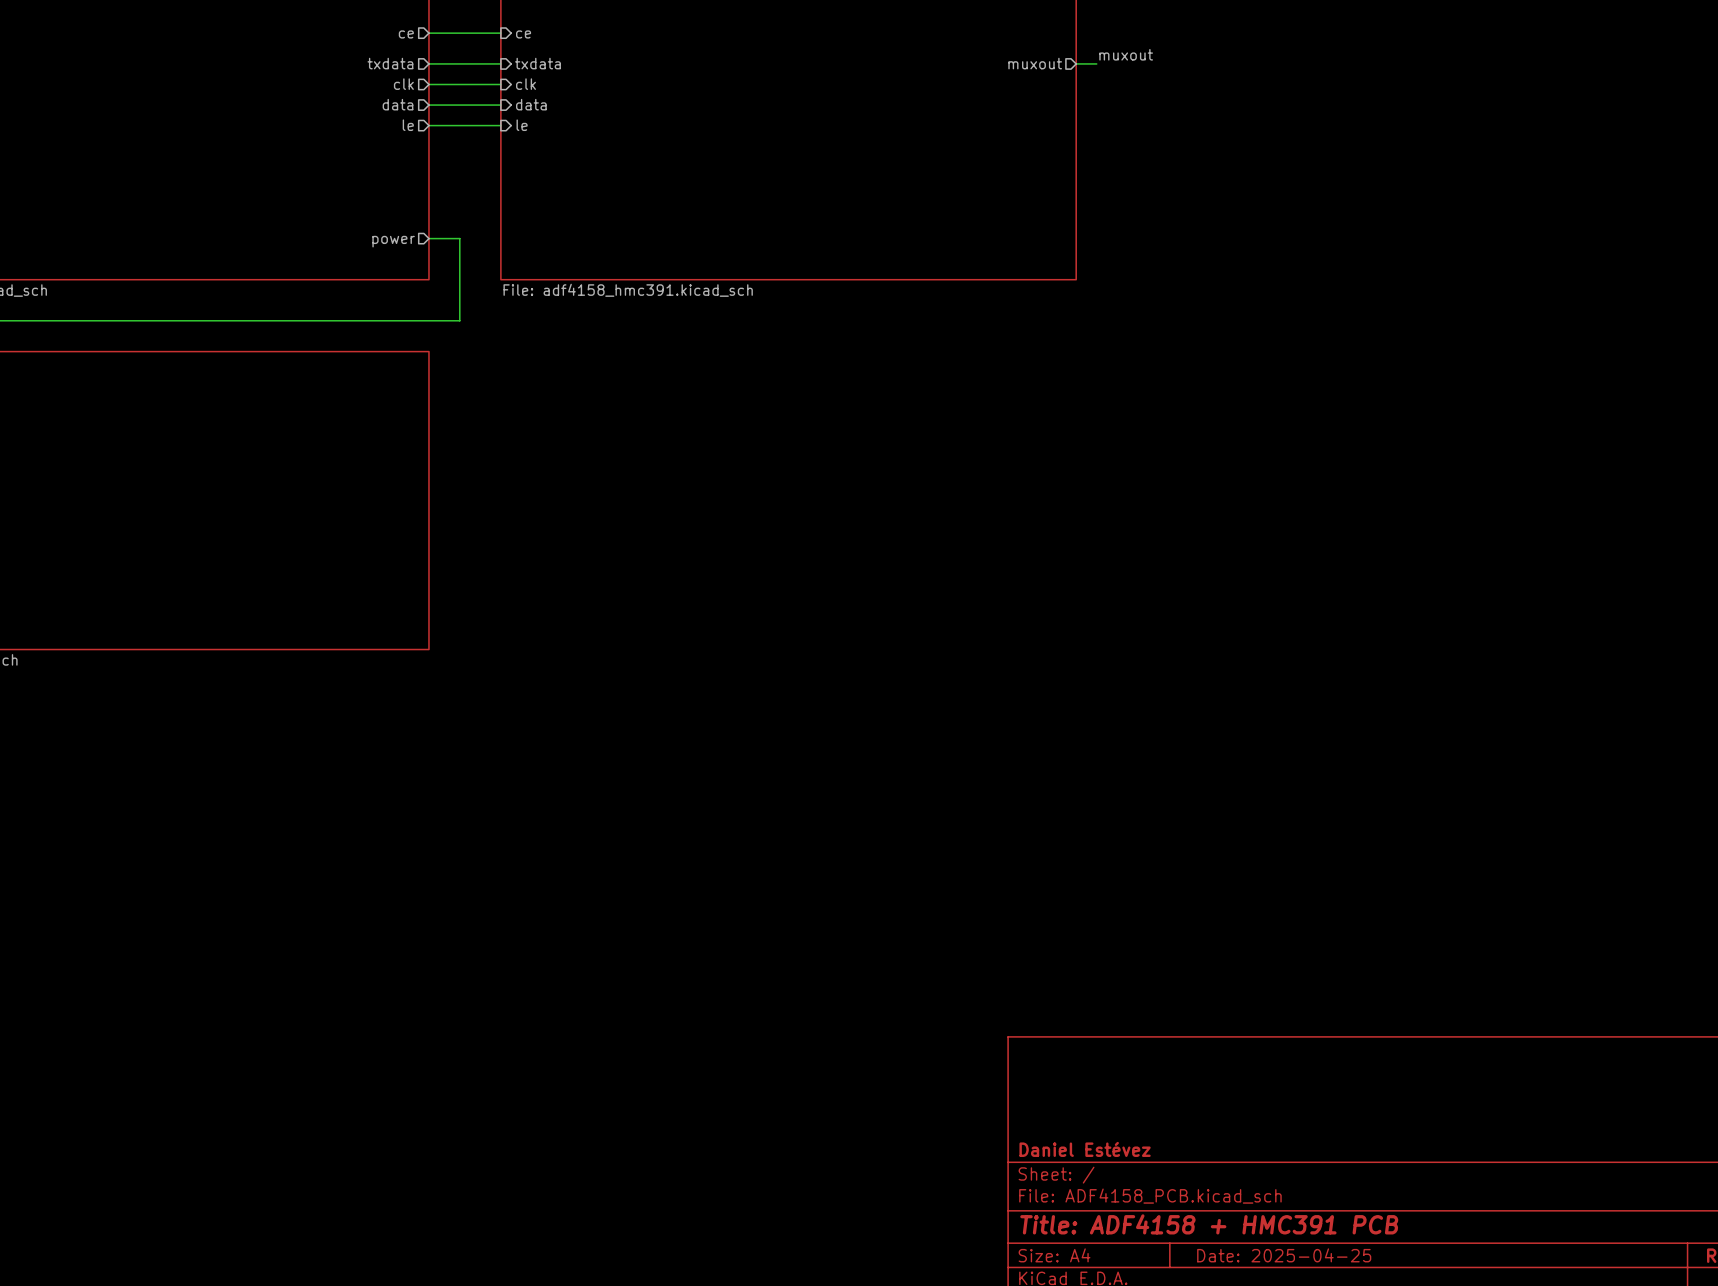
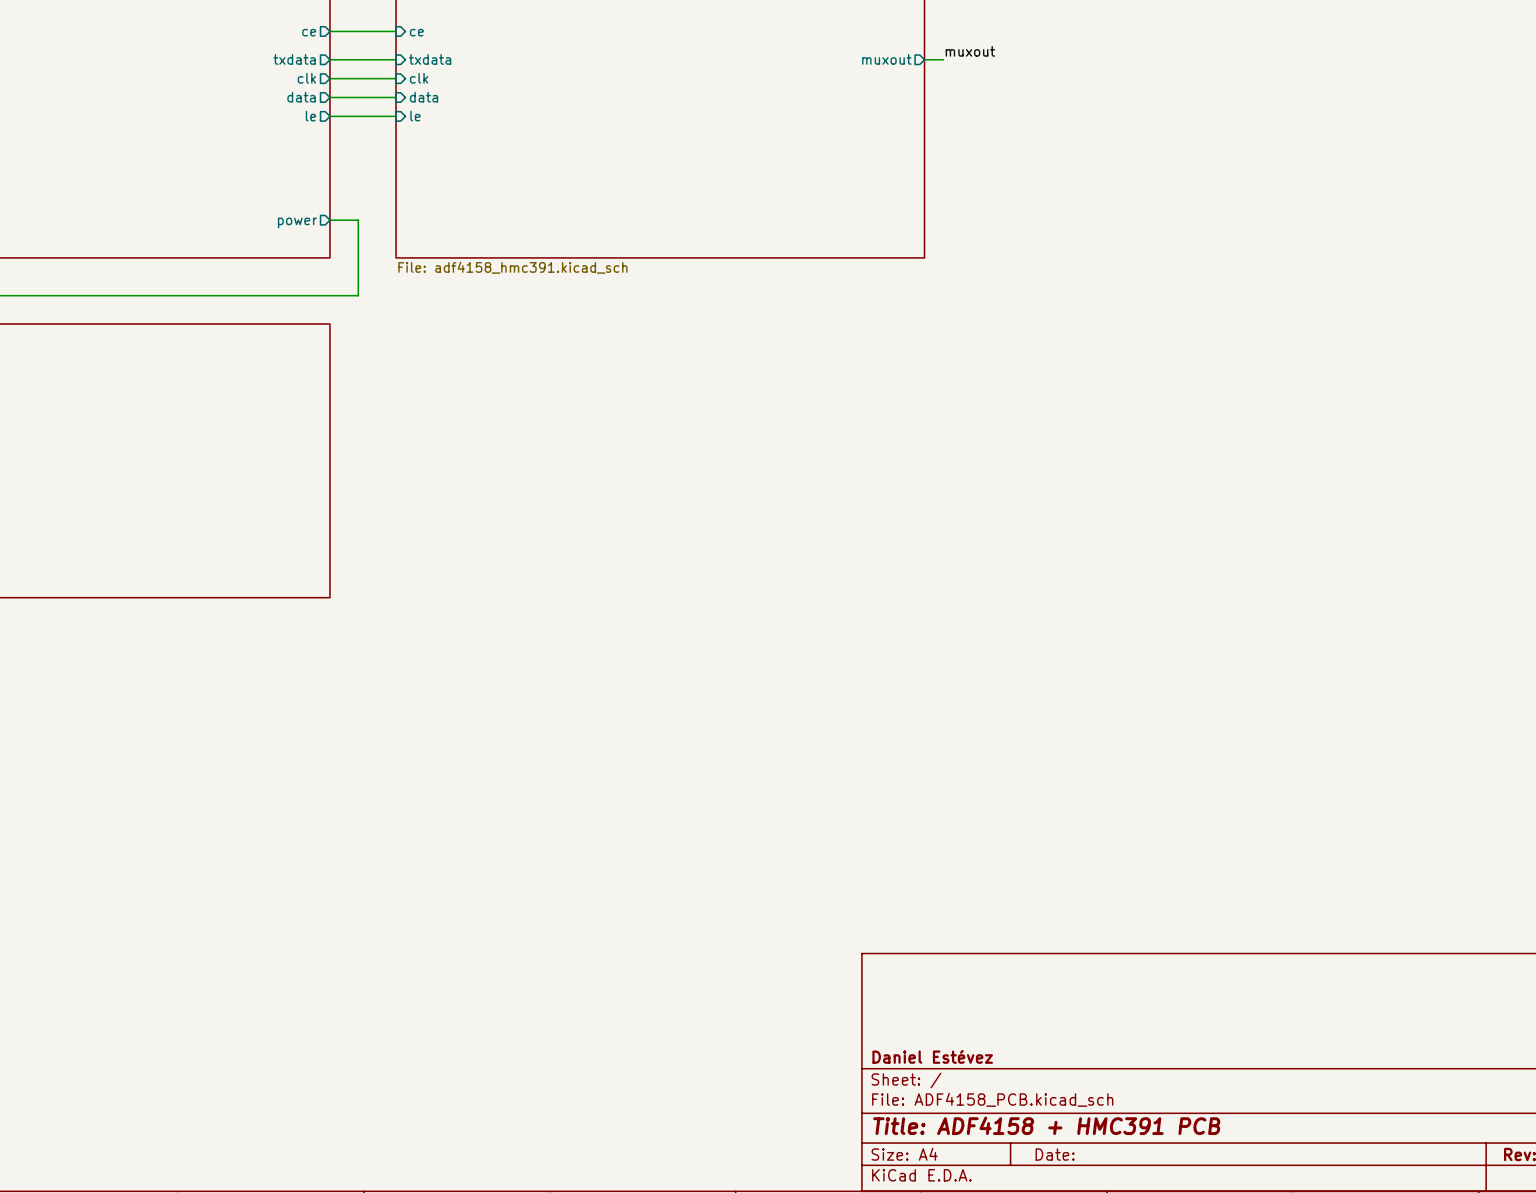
title block: Date: 2025-04-25 (1284, 1255) -> Date: (1055, 1154)

